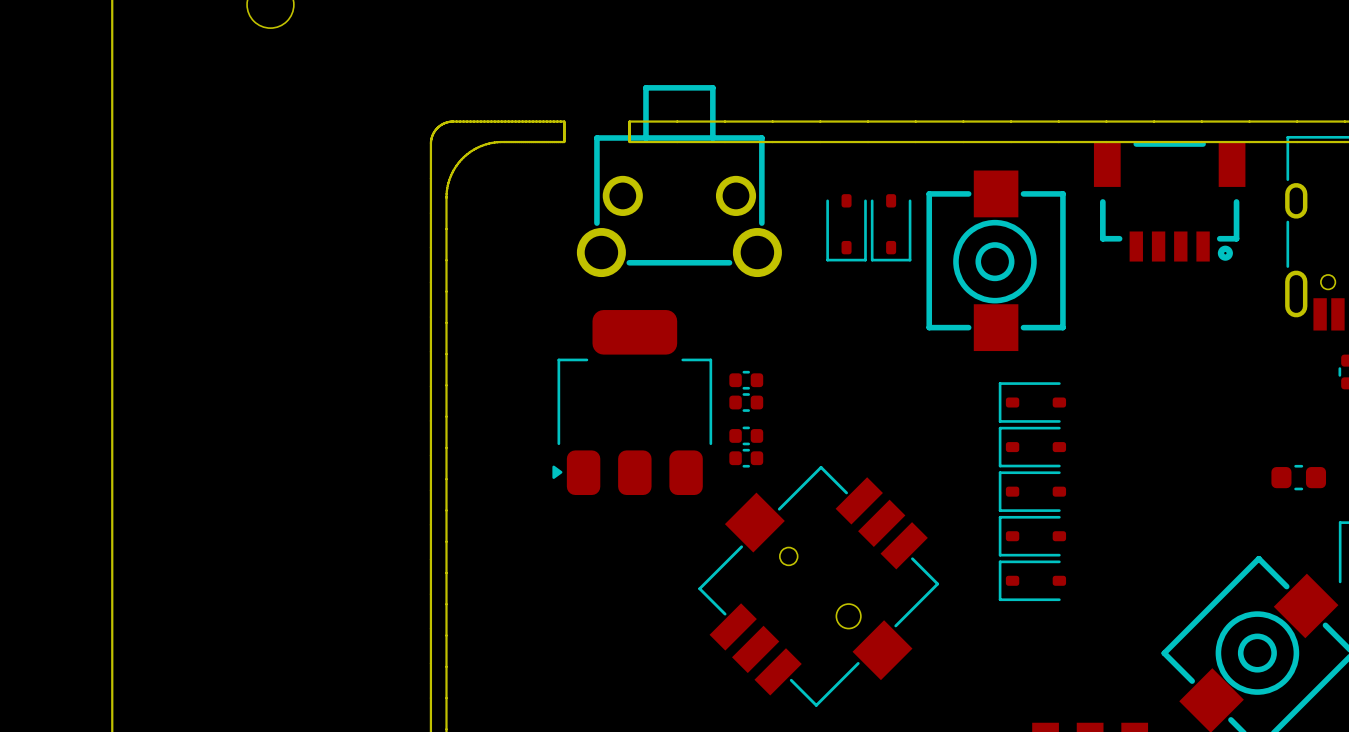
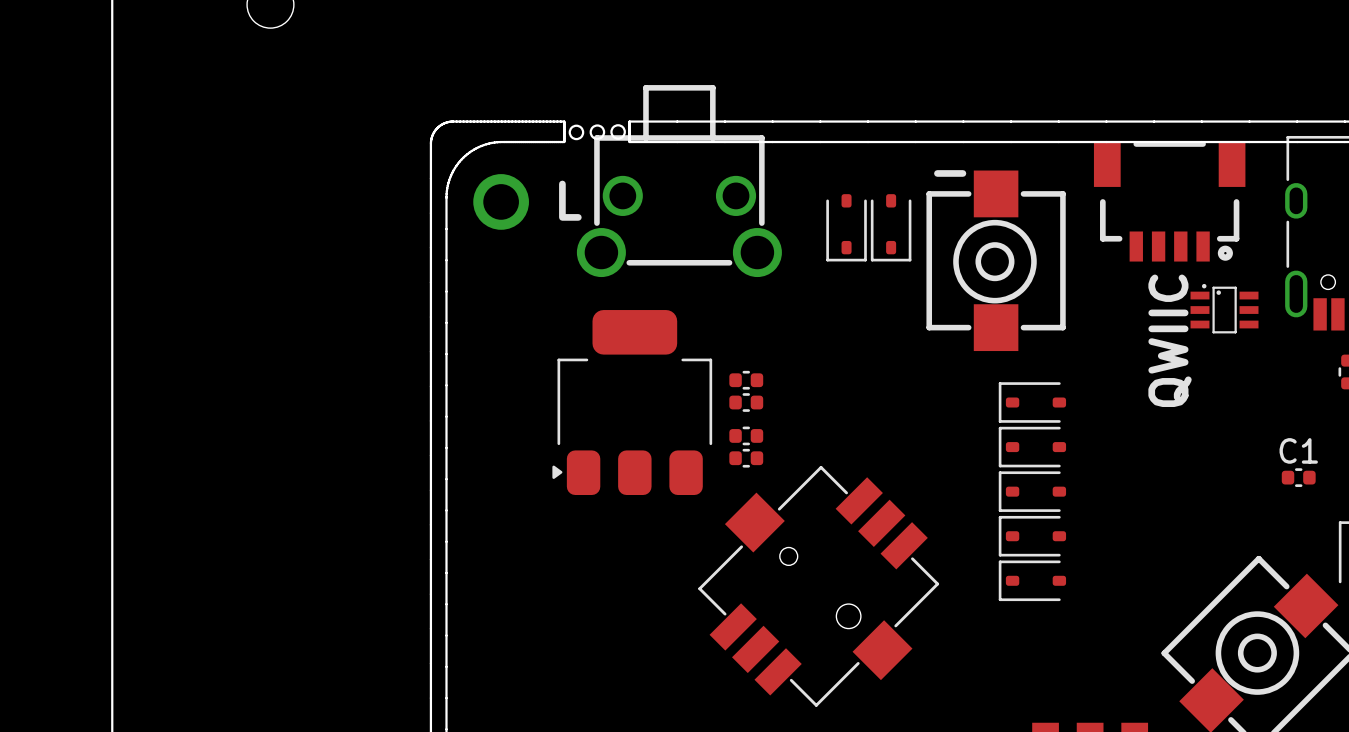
round board edge: none -> [568, 124, 585, 141]
round board edge: none -> [589, 124, 606, 140]
round board edge: none -> [610, 124, 626, 140]
text: none -> - (950, 173)
text: none -> L (570, 200)
part: none -> (501, 201)
part: none -> (1224, 308)
text: none -> QWIIC (1170, 340)
part: (1298, 477) -> none
C1: none -> (1298, 477)

